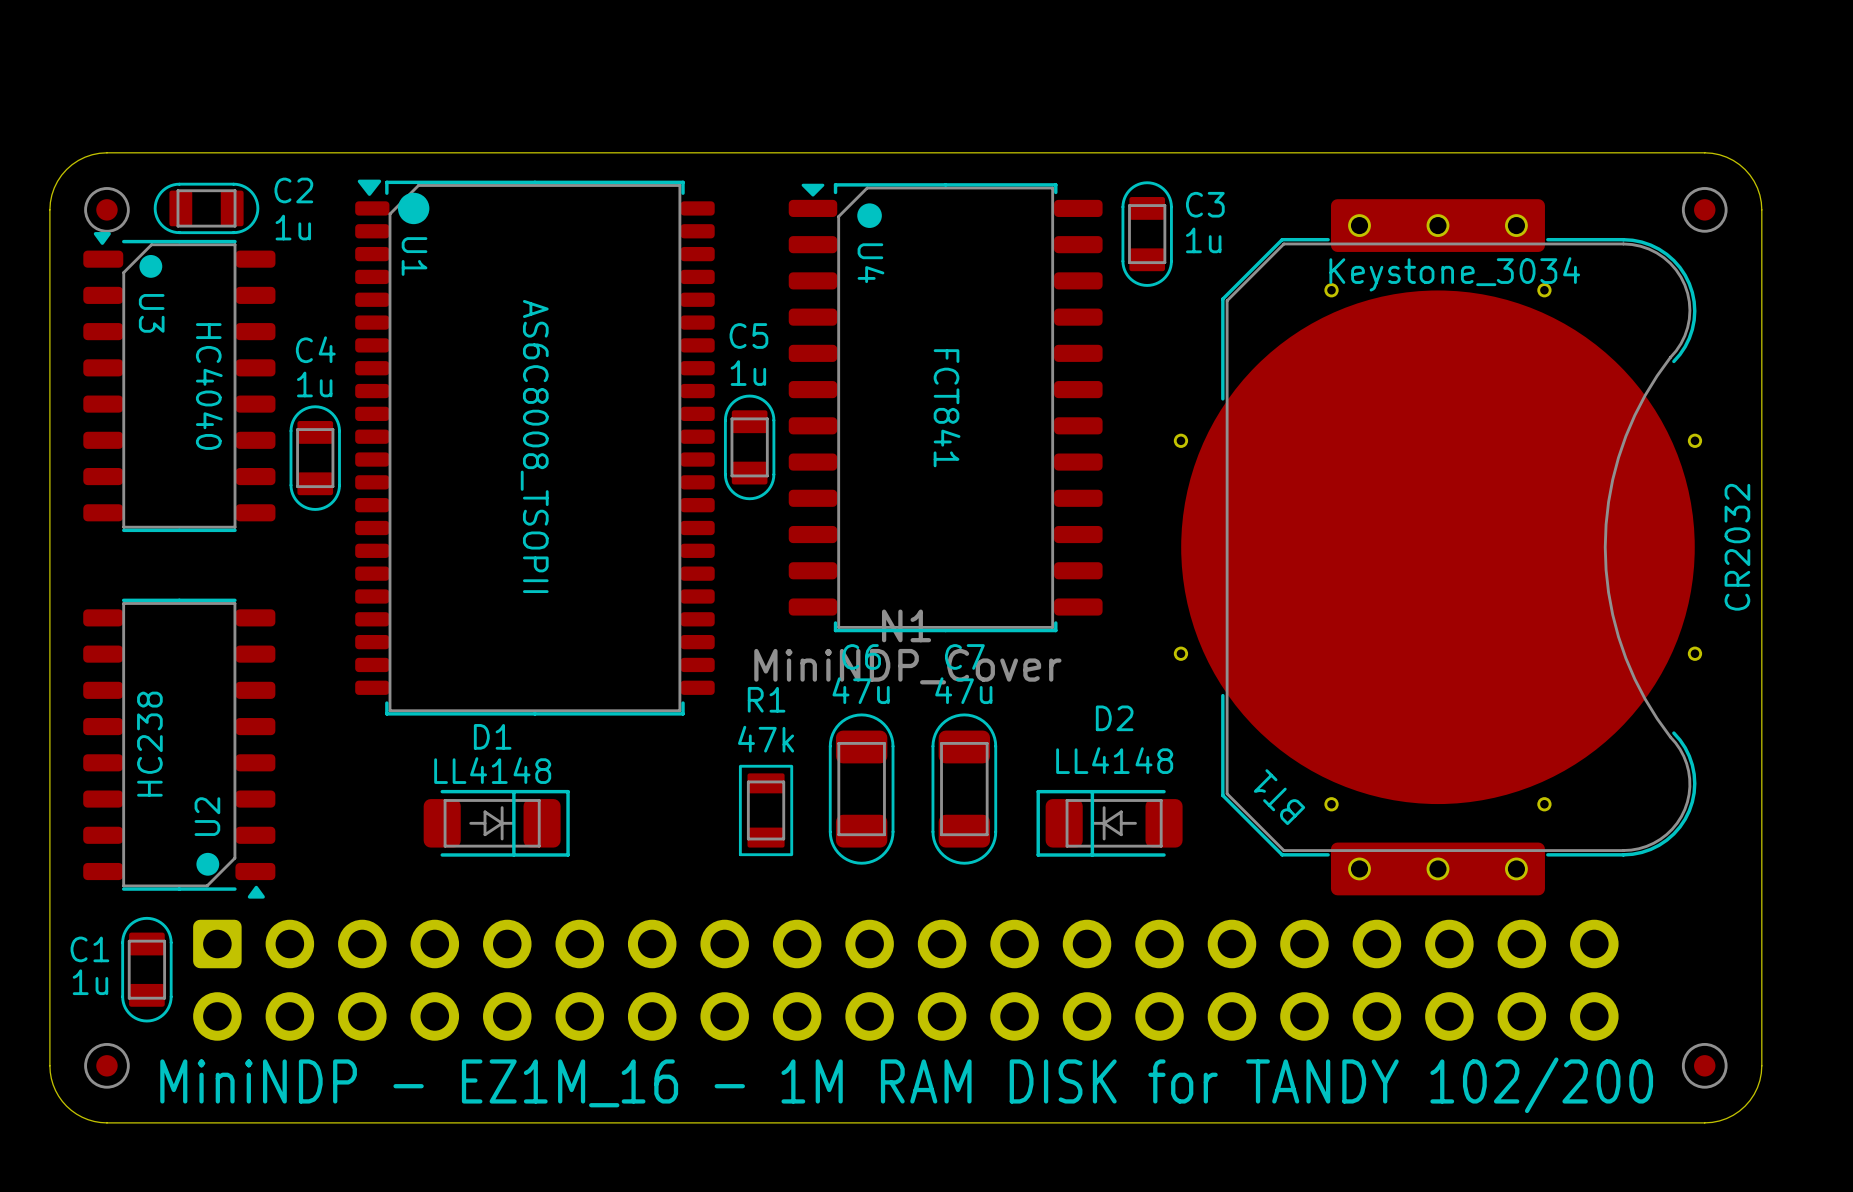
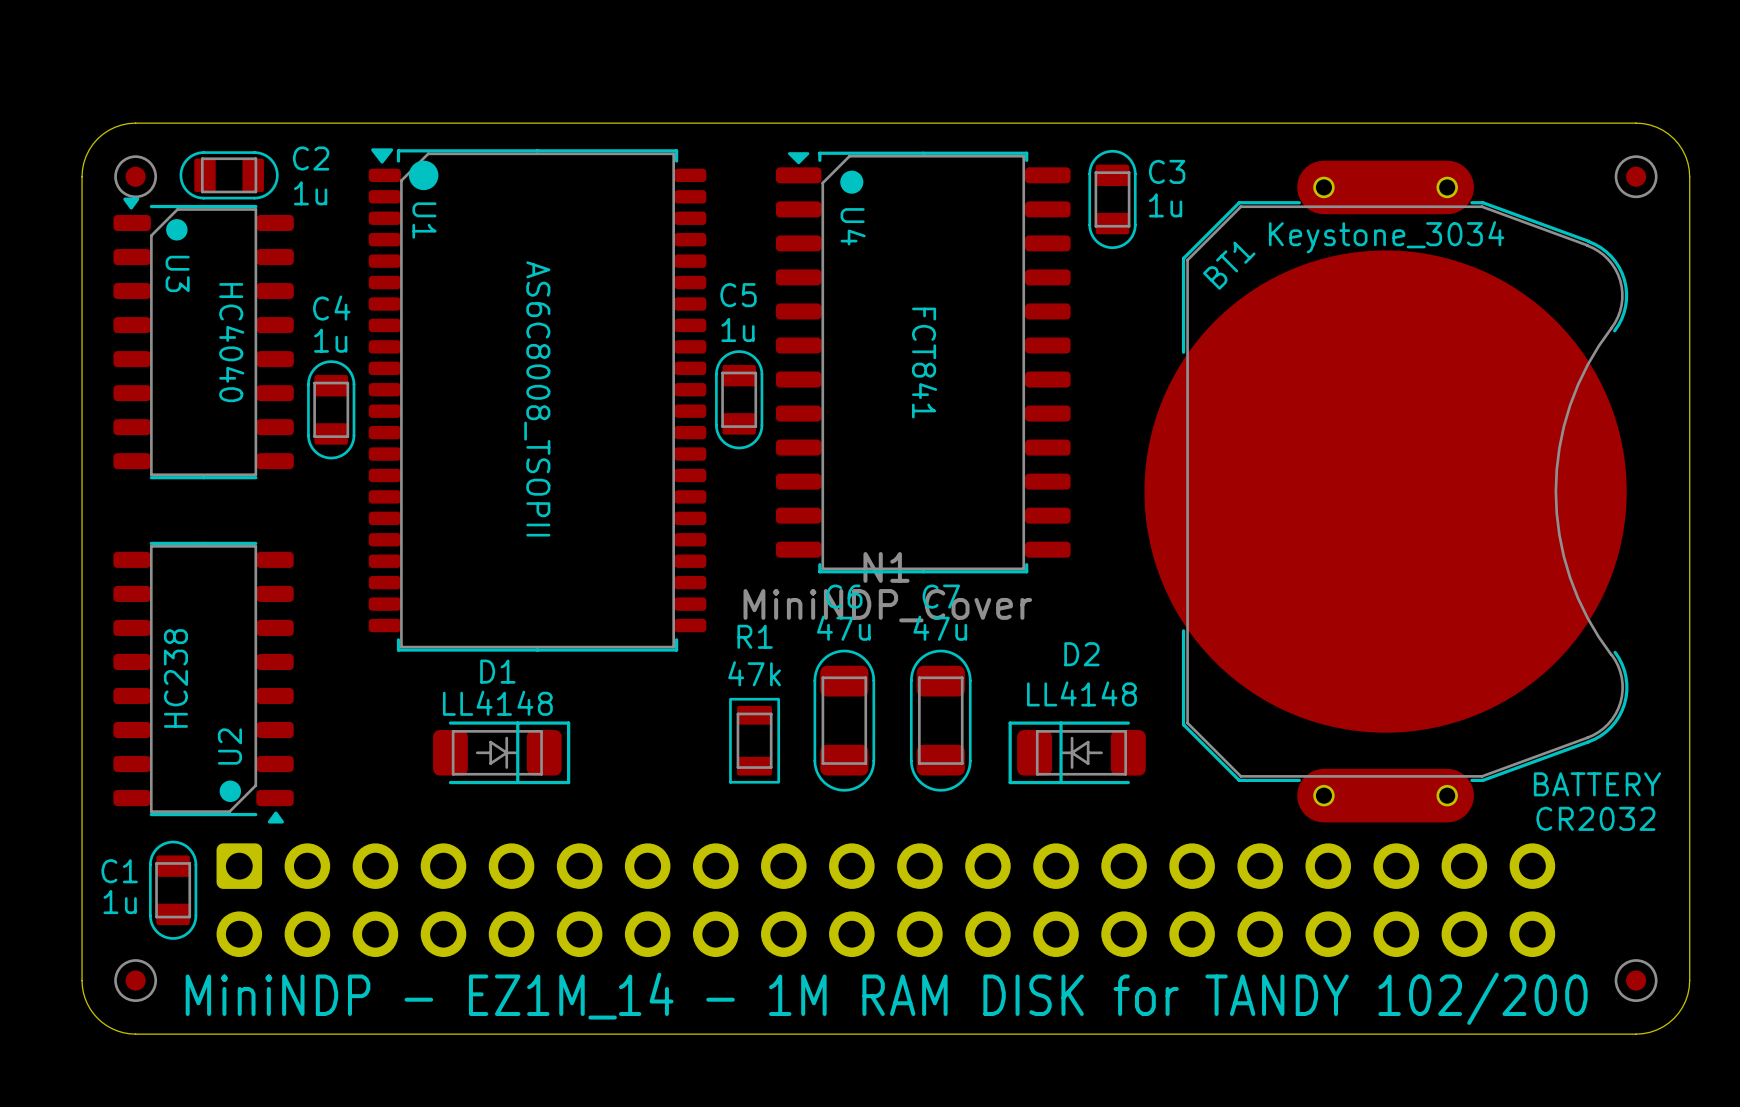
BT1 footprint: [1173, 199, 1703, 896] -> [1144, 160, 1629, 823]
part: none -> (1323, 187)
part: none -> (1447, 187)
text rotation: 0° (1737, 547) -> 90° clockwise (1595, 818)
text position: CR2032 (1737, 547) -> CR2032 (1595, 818)
BT1 name position: BT1 (1279, 797) -> BT1 (1229, 265)
text: none -> BATTERY (1597, 784)
part: none -> (1323, 795)
part: none -> (1447, 795)
text: MiniNDP - EZ1M_16 - 1M RAM DISK for TANDY 102/200 (906, 1085) -> MiniNDP - EZ1M_14 - 1M RAM DISK for TANDY 102/200 (886, 998)

